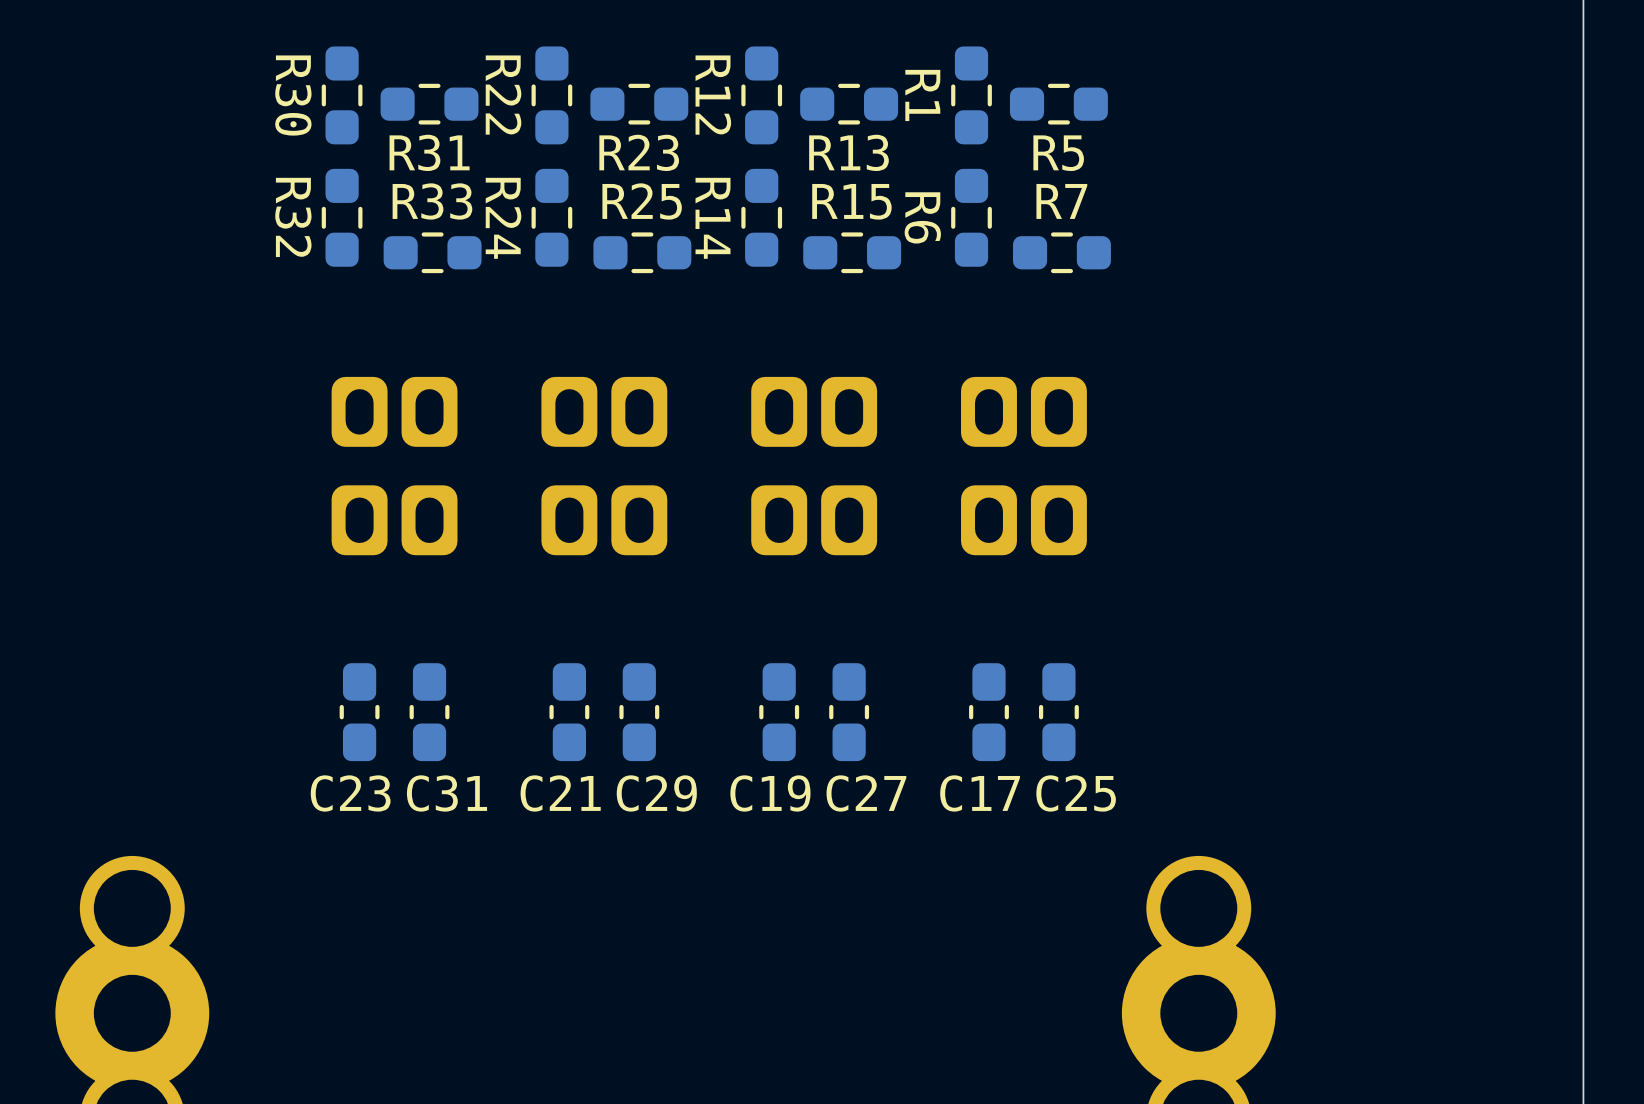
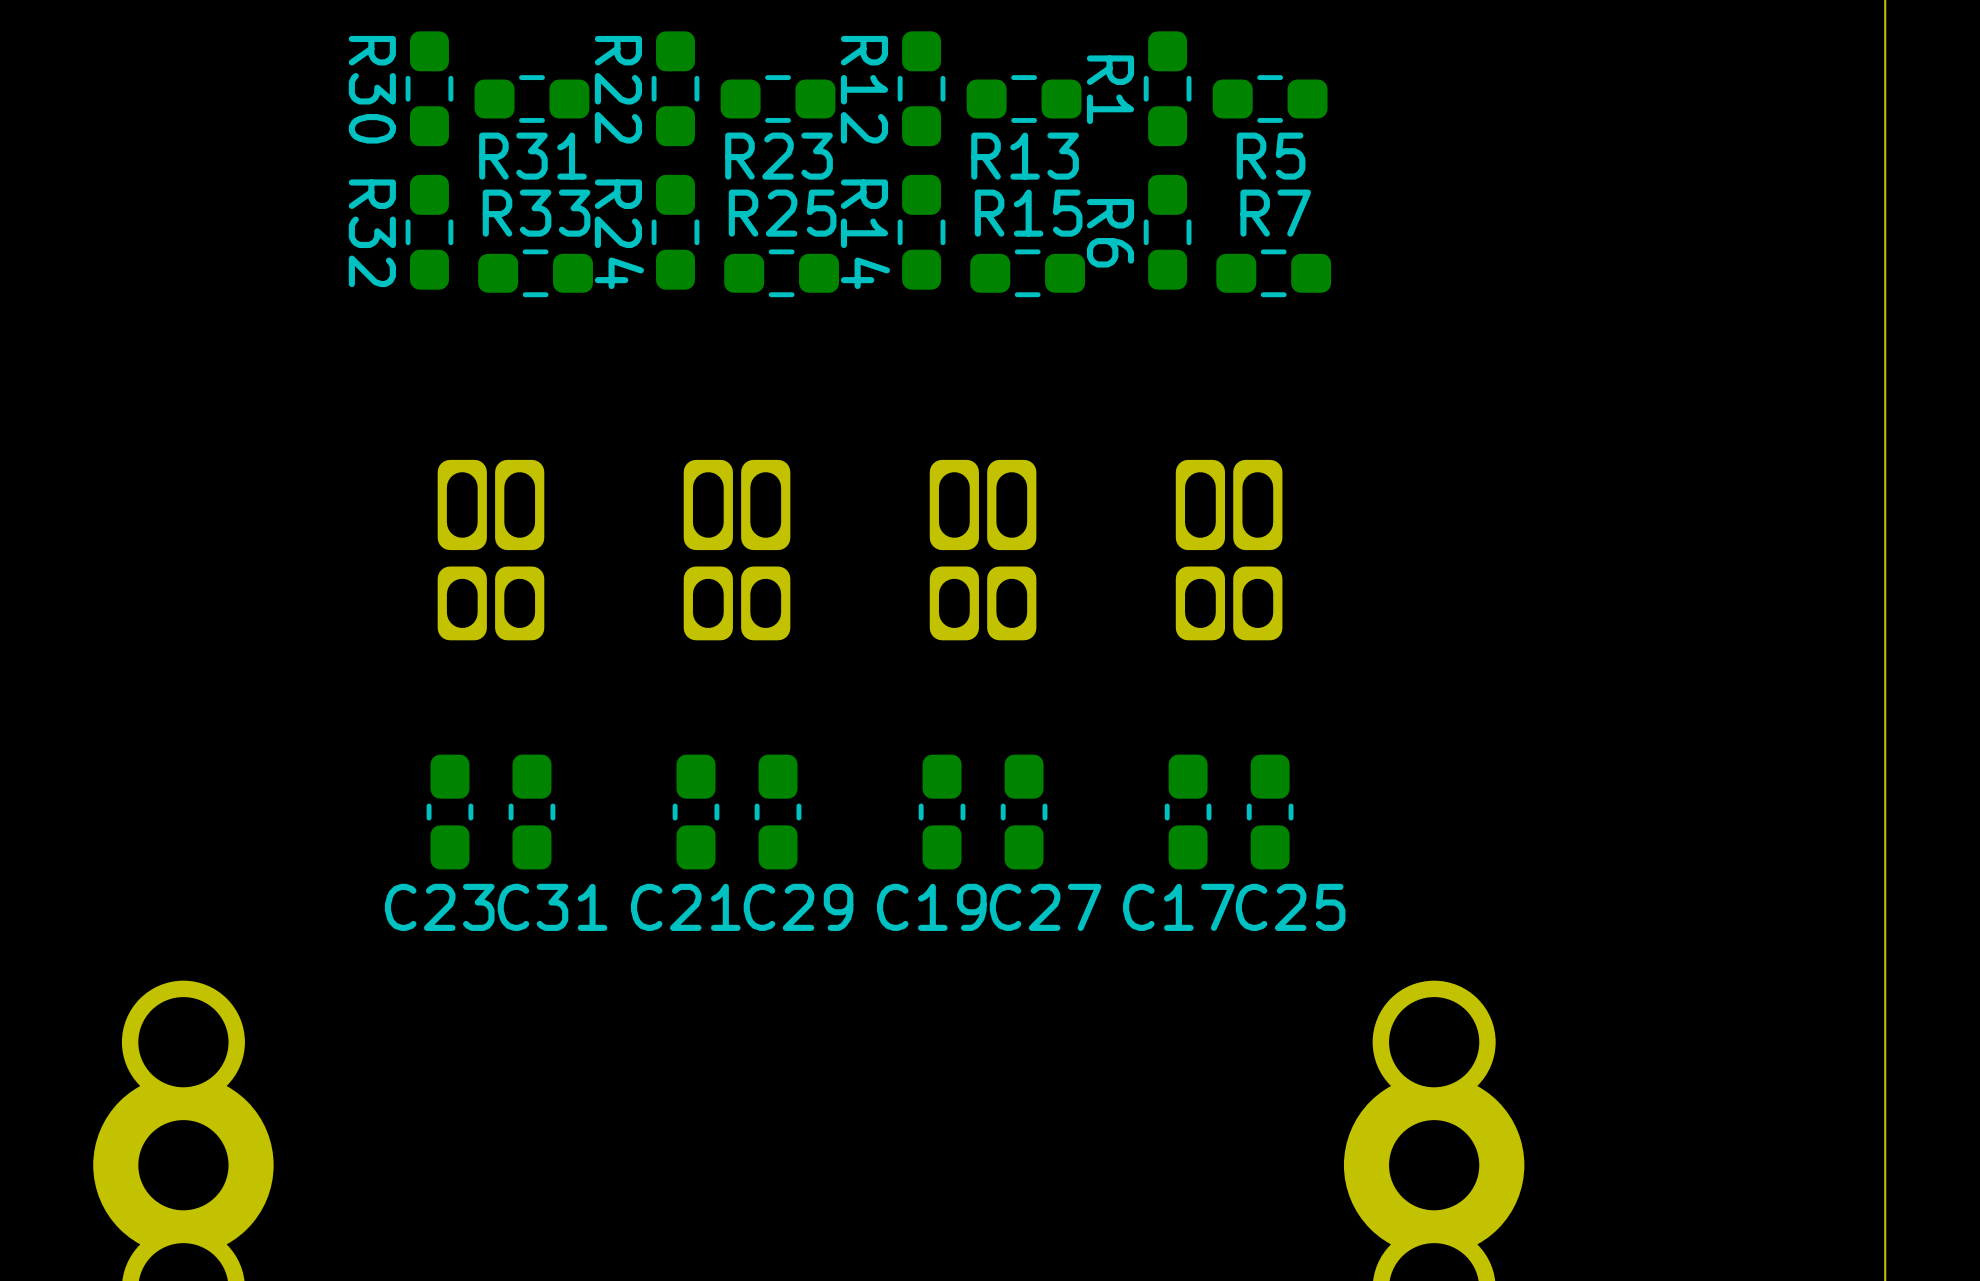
part footprint: [331, 376, 458, 556] -> [437, 459, 545, 641]
part footprint: [541, 376, 668, 556] -> [683, 459, 791, 641]
part footprint: [751, 376, 878, 556] -> [929, 459, 1037, 641]
part footprint: [961, 376, 1087, 556] -> [1175, 459, 1283, 641]

